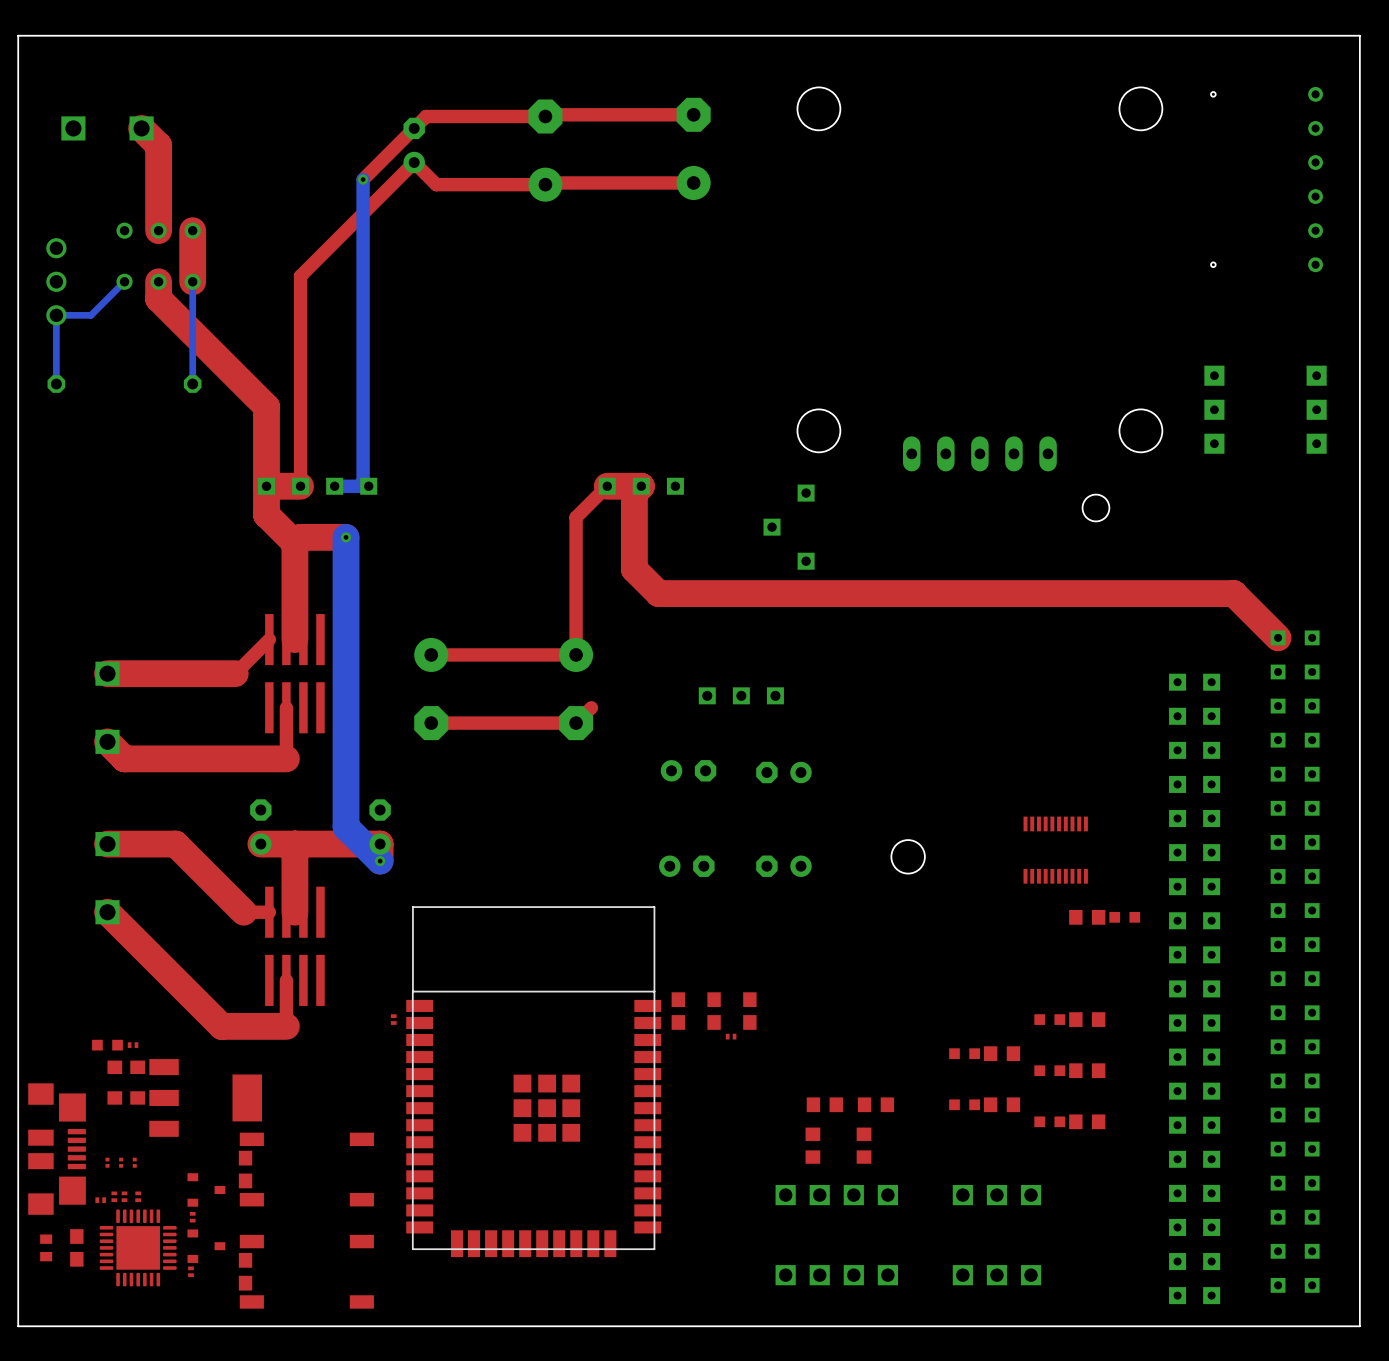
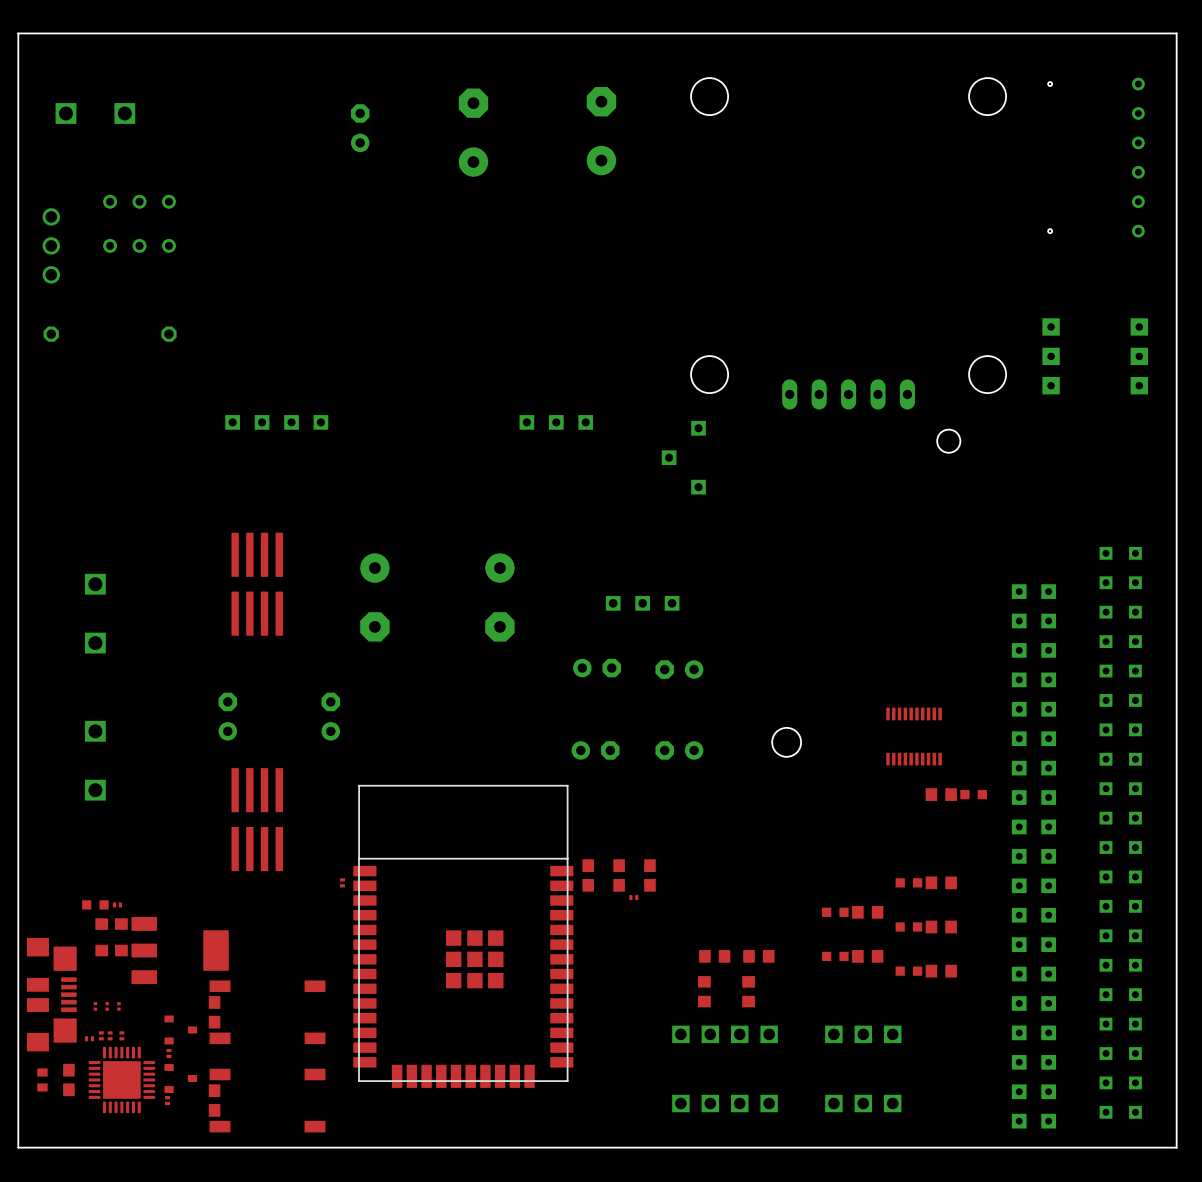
top track: (693, 114) (426, 116) (363, 179) -> none
top track: (141, 128) (158, 145) (158, 230) -> none
bottom track: (363, 179) (363, 480) (368, 486) (334, 486) -> none
via: (363, 179) -> none
top track: (693, 182) (436, 184) (414, 162) (300, 276) (300, 486) (266, 486) -> none
top track: (192, 230) (192, 281) -> none
bottom track: (124, 281) (91, 315) (56, 315) (56, 384) -> none
top track: (158, 281) (158, 298) (266, 406) (266, 514) (294, 543) -> none
bottom track: (192, 281) (192, 384) -> none
top track: (346, 537) (300, 537) (294, 543) -> none
bottom track: (346, 537) (346, 827) (380, 861) -> none
via: (346, 537) -> none
top track: (294, 543) (294, 639) -> none
top track: (1278, 637) (1233, 593) (658, 593) (634, 569) (634, 493) (641, 486) (607, 486) (576, 517) (576, 654) (431, 654) -> none
top track: (269, 639) (235, 673) (107, 673) -> none
top track: (286, 707) (286, 758) (124, 758) (107, 741) -> none
top track: (591, 707) (576, 723) (431, 723) -> none
top track: (107, 844) (175, 844) (243, 912) (269, 912) -> none
top track: (260, 844) (380, 844) (380, 861) -> none
top track: (294, 844) (294, 912) -> none
via: (380, 861) -> none
top track: (107, 912) (221, 1026) (286, 1026) (286, 980) -> none

